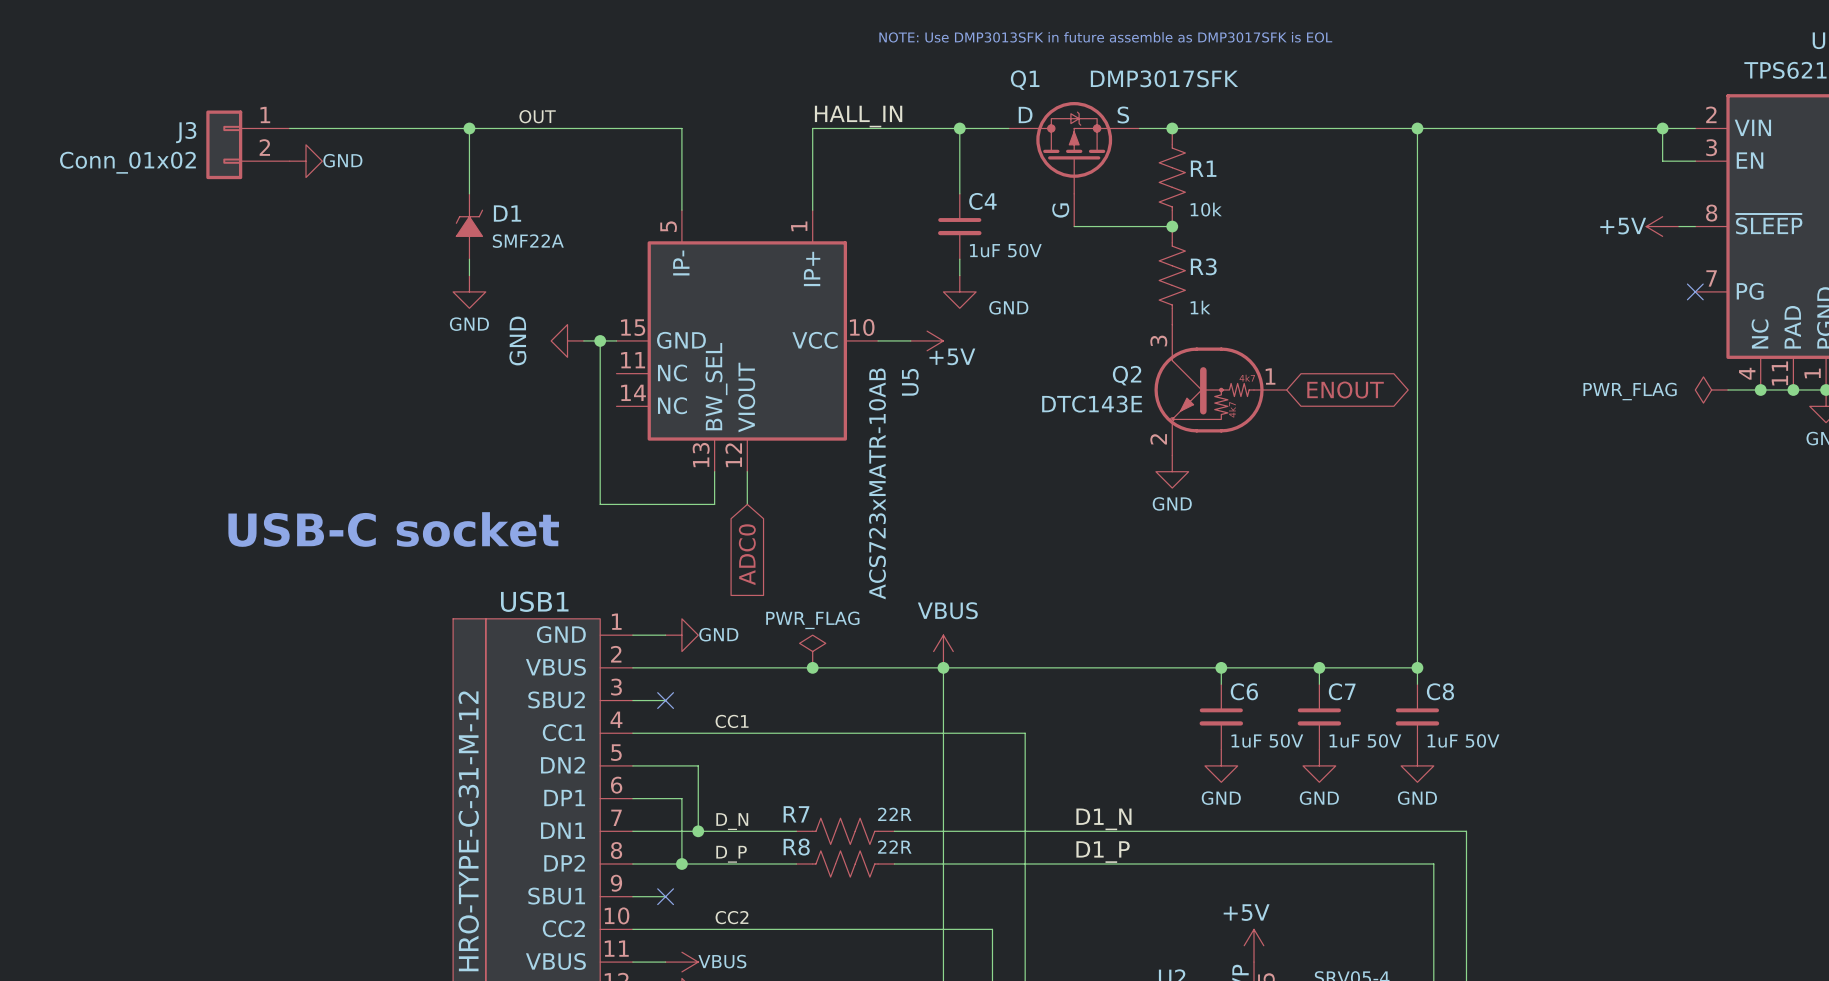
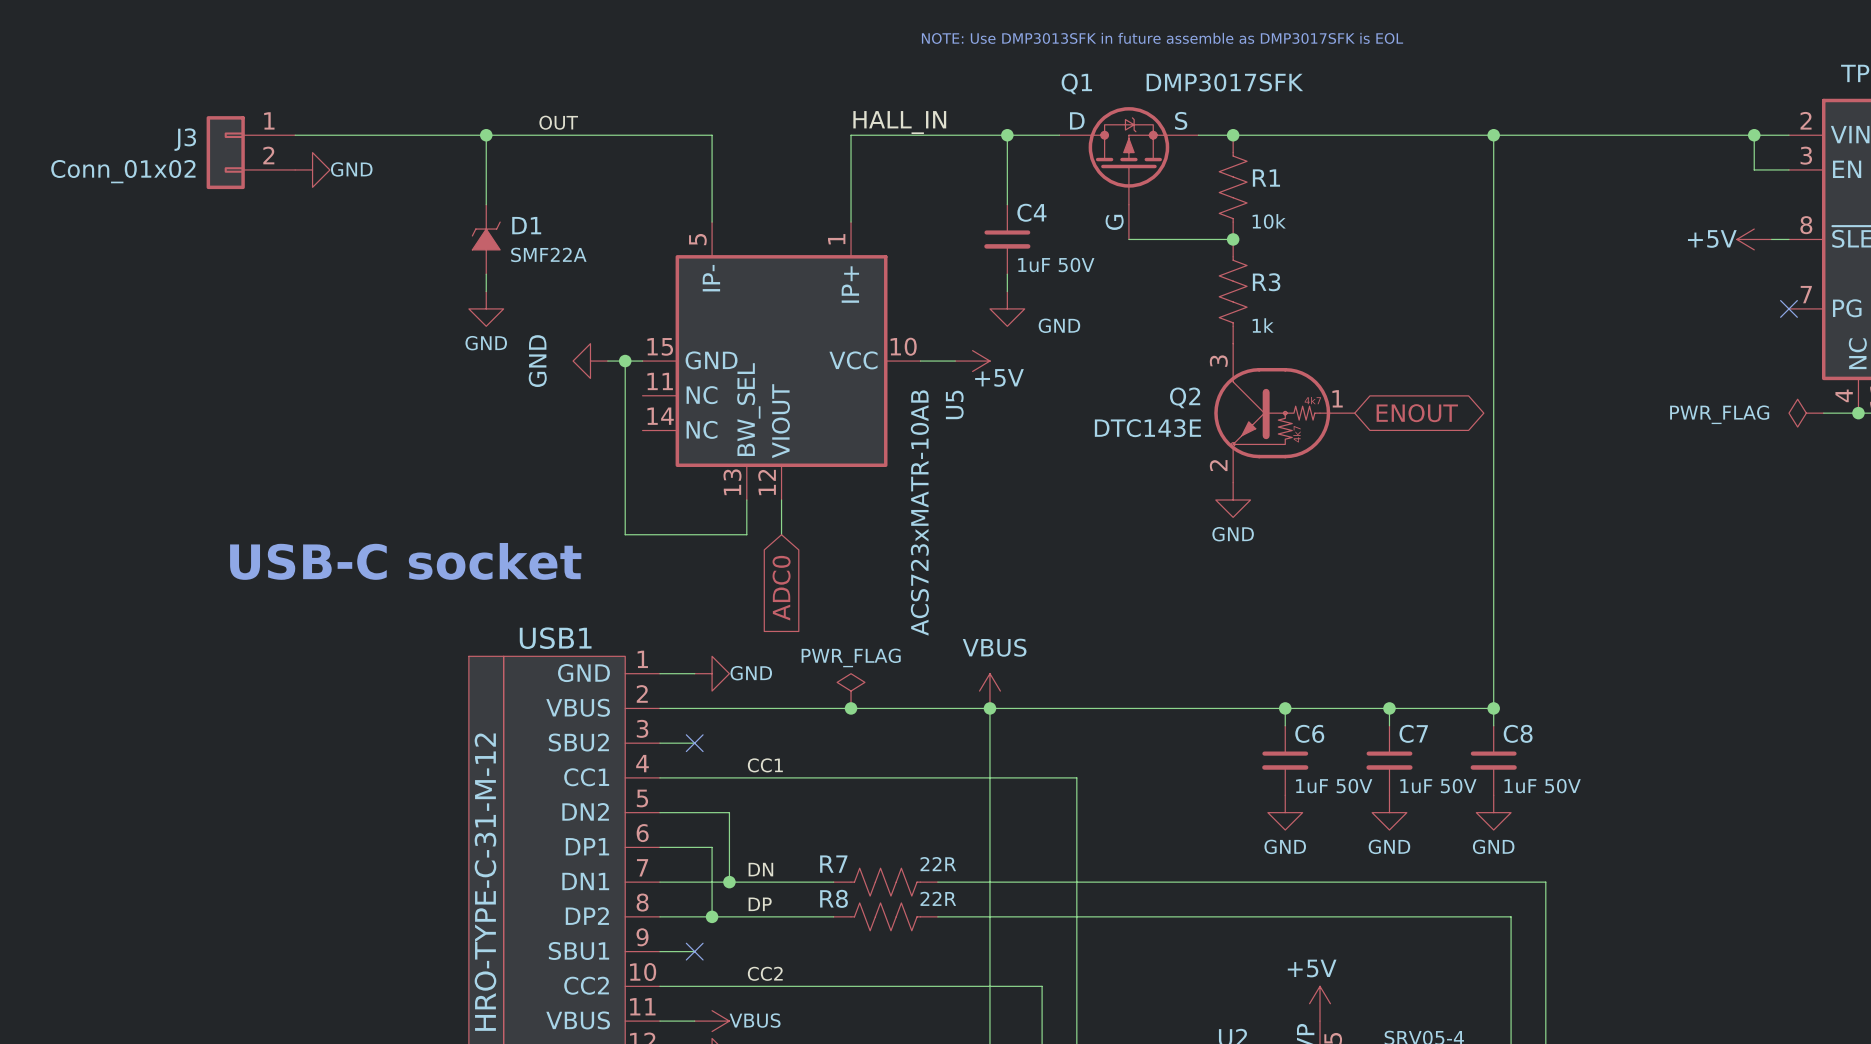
label: D1_N (1103, 819) -> none
label: D_N (732, 821) -> DN (760, 869)
label: D1_P (1103, 852) -> none
label: D_P (731, 854) -> DP (760, 904)

